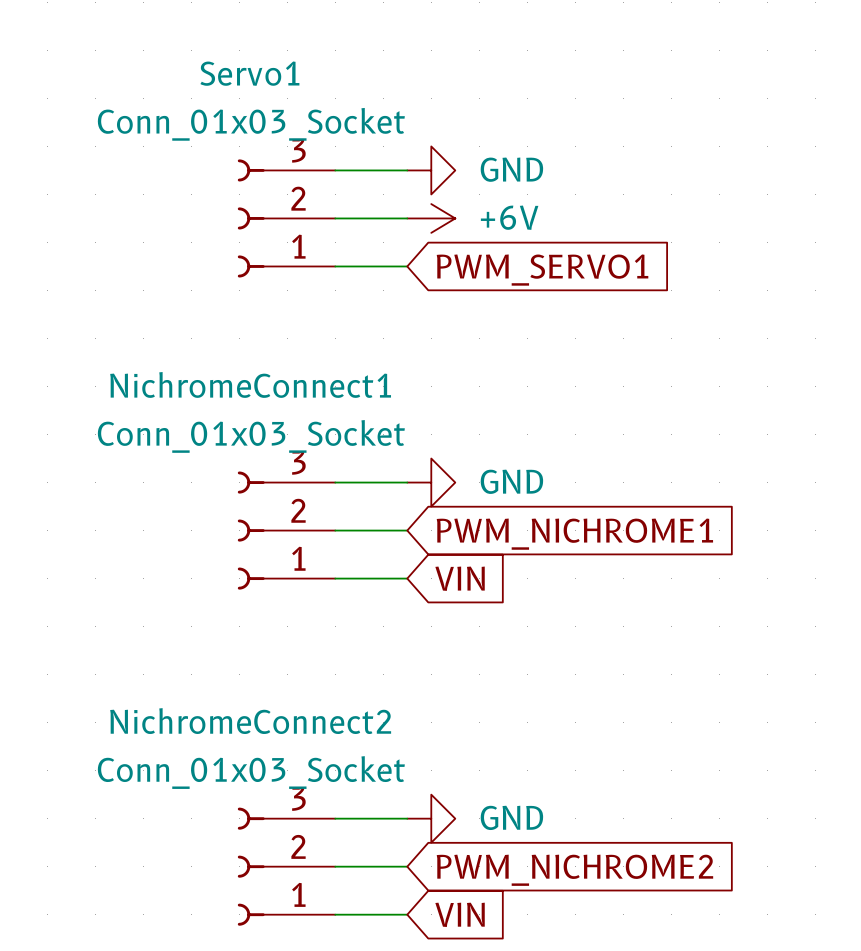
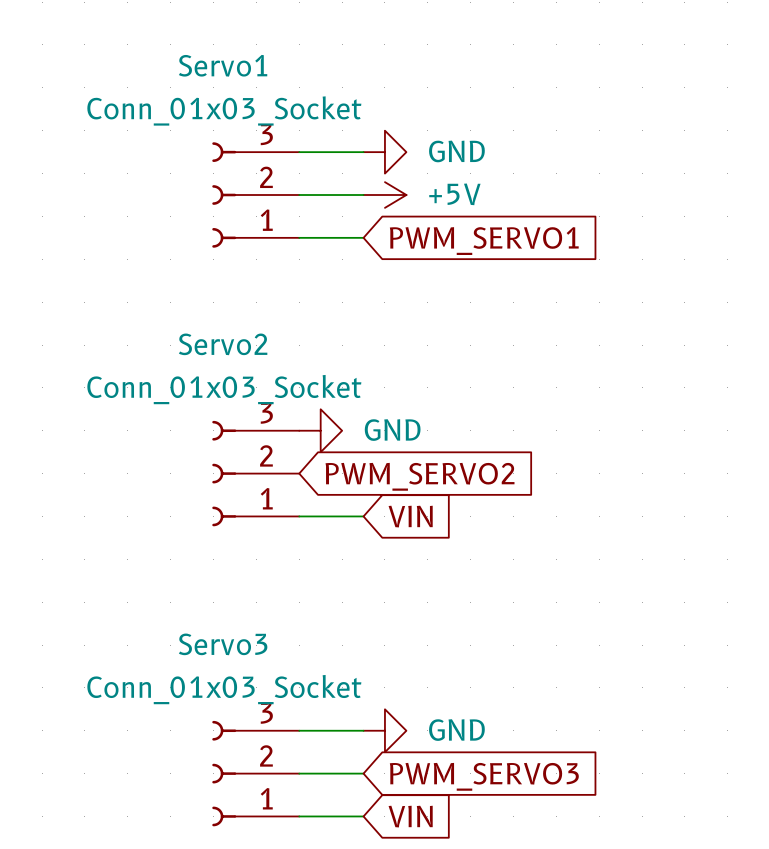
power symbol: +6V (431, 218) -> +5V (384, 195)
NichromeConnect1 name: NichromeConnect1 (250, 384) -> Servo2 (223, 344)
wire: (335, 482) (407, 482) -> none
power symbol position: GND (431, 482) -> GND (320, 430)
wire: (335, 530) (407, 530) -> none
global label: none -> PWM_SERVO2 (420, 476)
global label: PWM_NICHROME1 (574, 534) -> none
NichromeConnect2 name: NichromeConnect2 (250, 721) -> Servo3 (223, 644)
global label: PWM_NICHROME2 (574, 870) -> PWM_SERVO3 (484, 776)

